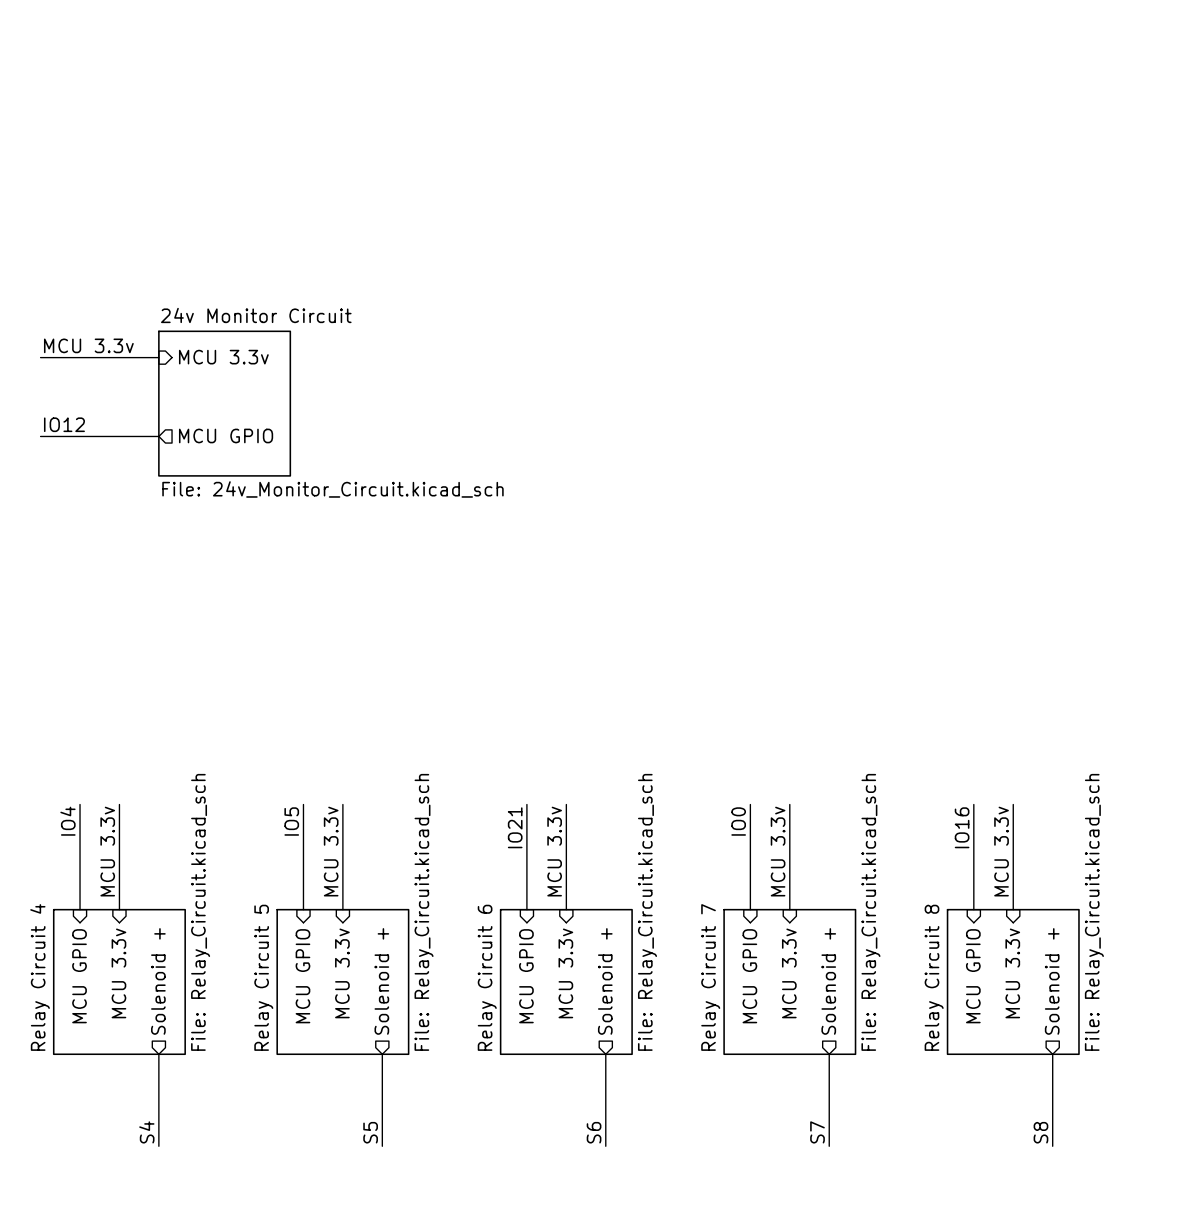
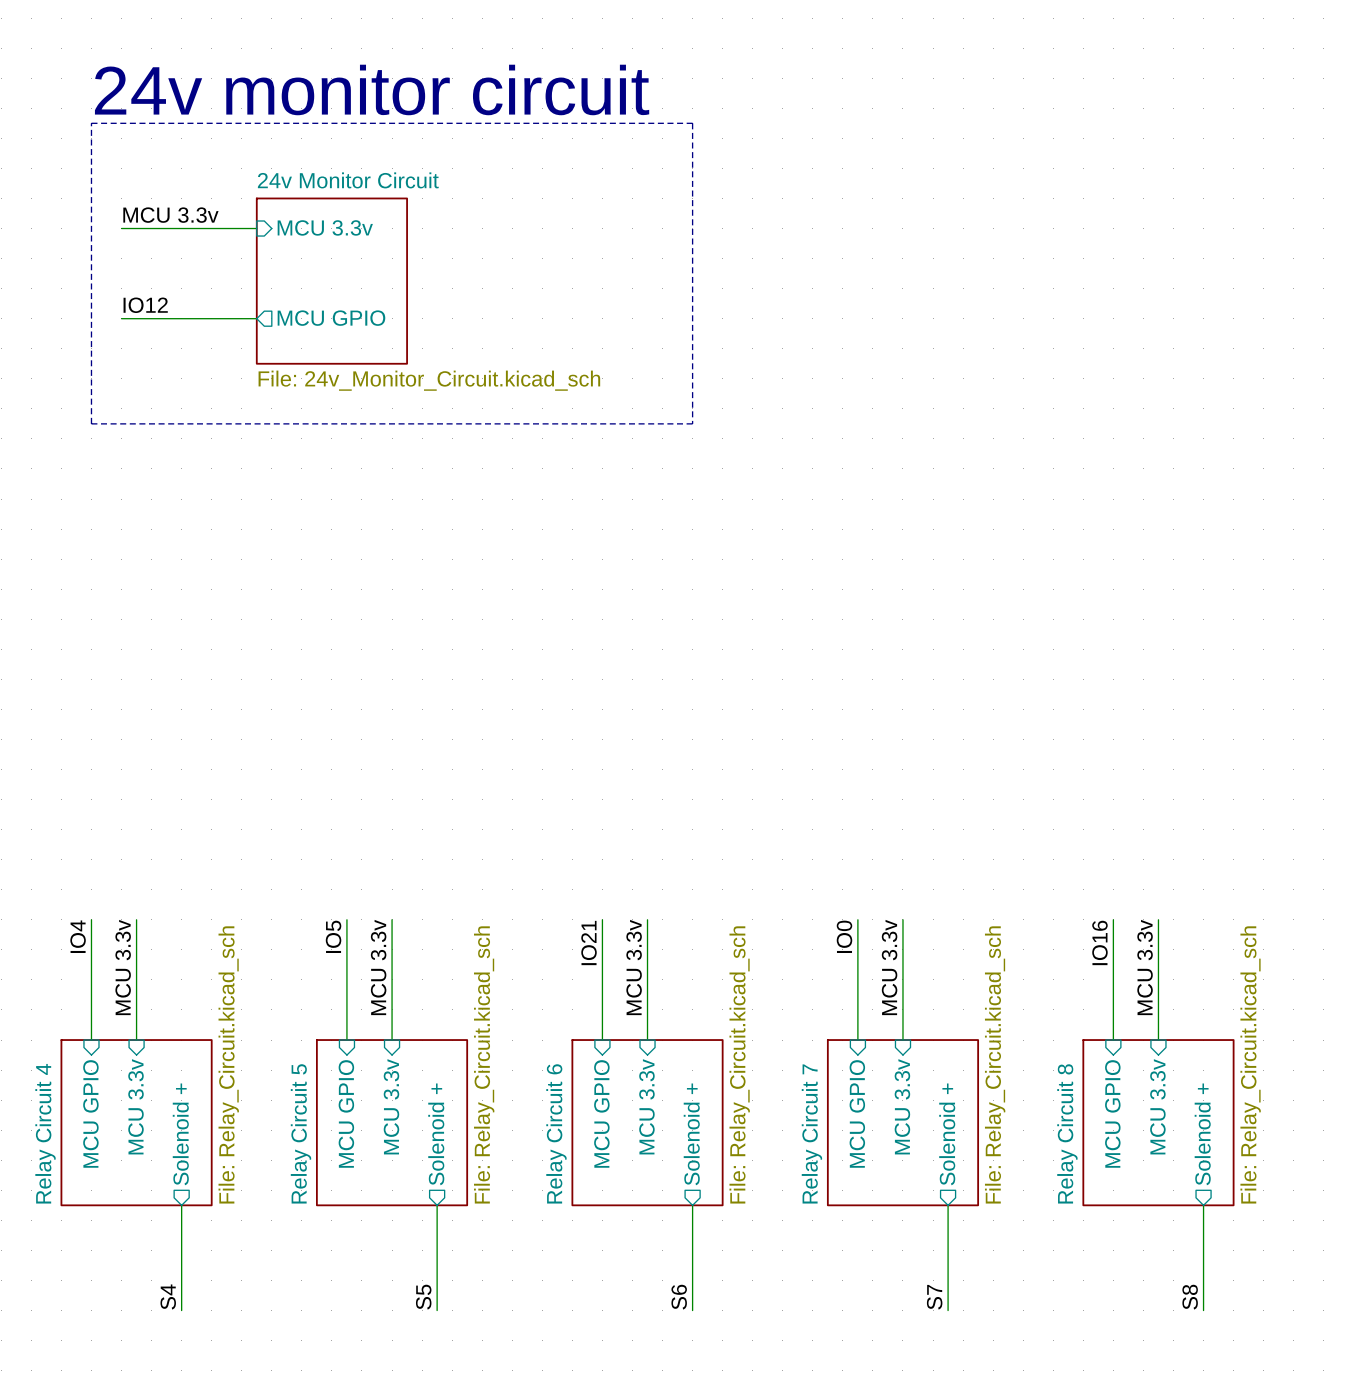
text: none -> 24v monitor circuit (372, 89)
line: none -> (91, 123) (692, 123) (692, 423) (91, 423) (91, 123)
label position: MCU 3.3v (88, 345) -> MCU 3.3v (170, 215)
wire: (40, 357) (158, 357) -> (121, 228) (256, 228)
sheet pin position: MCU 3.3v (223, 357) -> MCU 3.3v (325, 227)
sheet 24v Monitor Circuit position: (224, 403) -> (331, 281)
label position: IO12 (64, 424) -> IO12 (145, 305)
sheet pin position: MCU GPIO (226, 435) -> MCU GPIO (331, 318)
wire: (40, 436) (158, 436) -> (121, 318) (256, 318)

